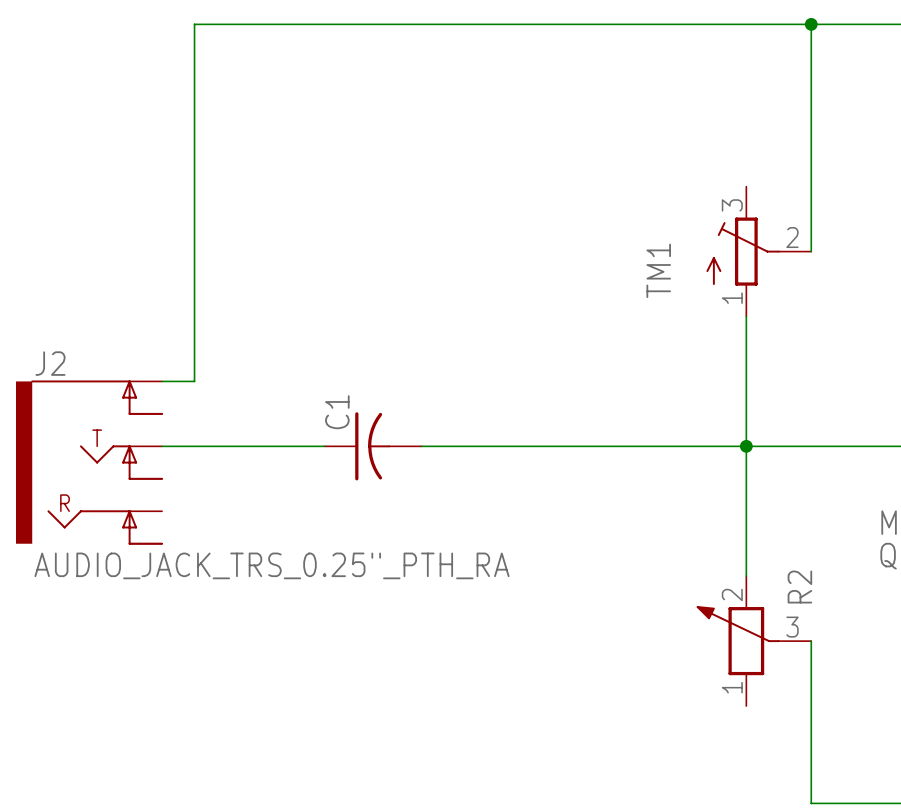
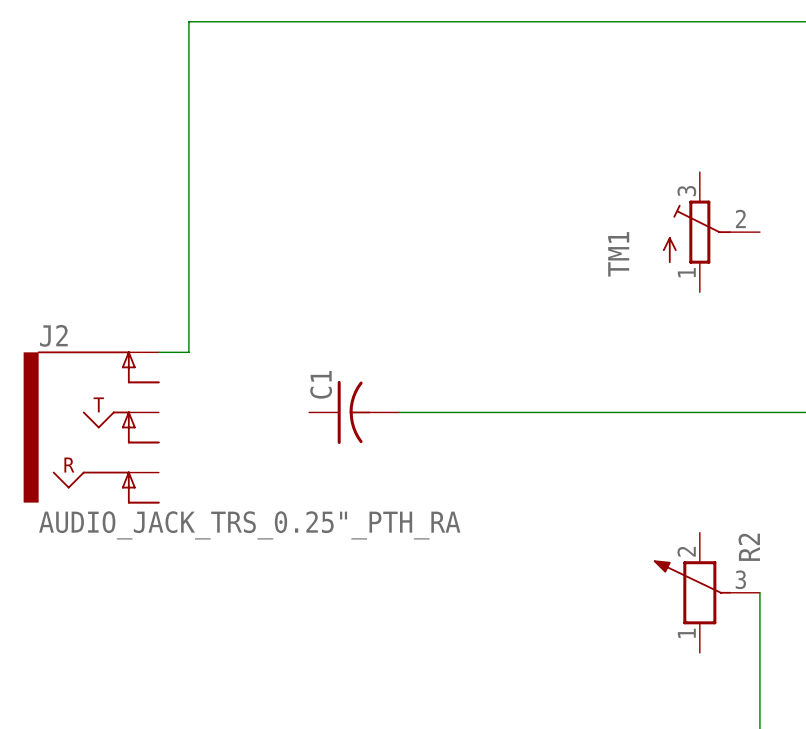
wire: (811, 24) (811, 251) -> none
junction: (811, 24) -> none
wire: (746, 316) (746, 576) -> none
wire: (162, 446) (324, 446) -> none
junction: (746, 446) -> none

